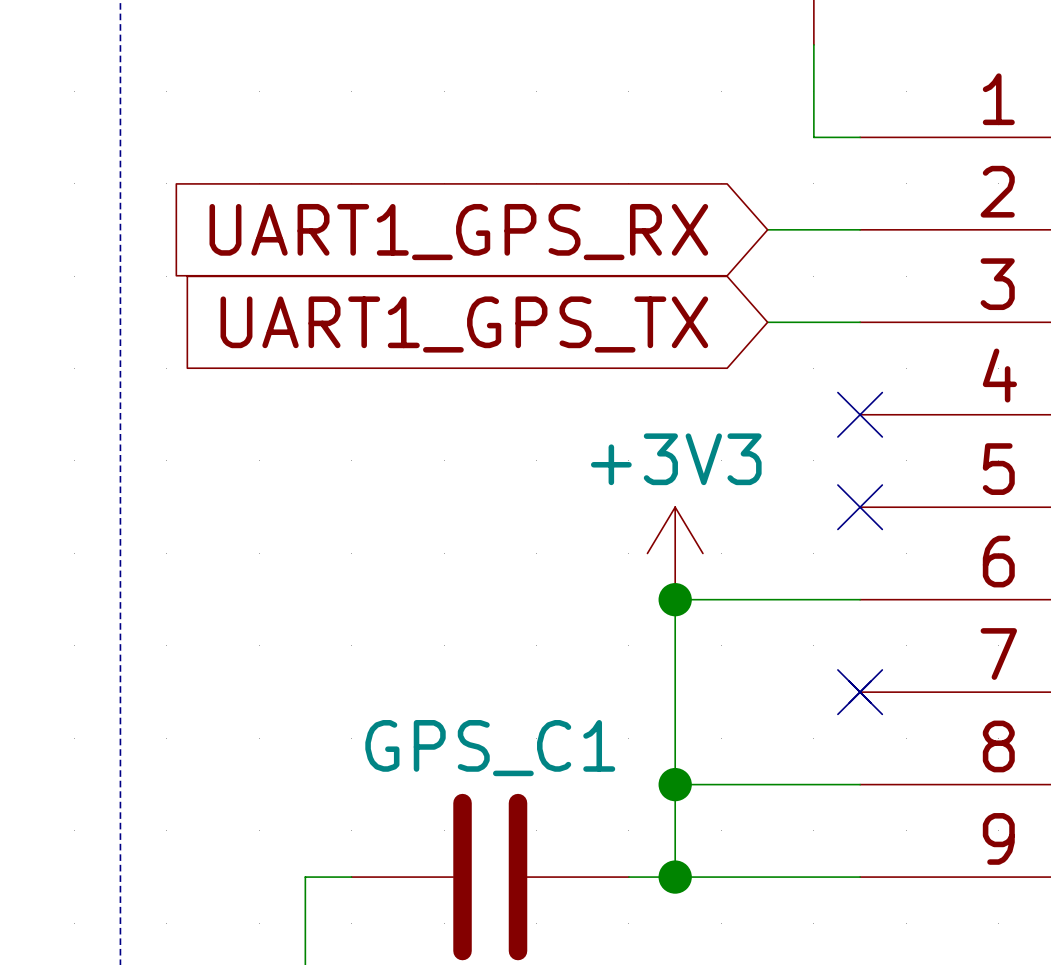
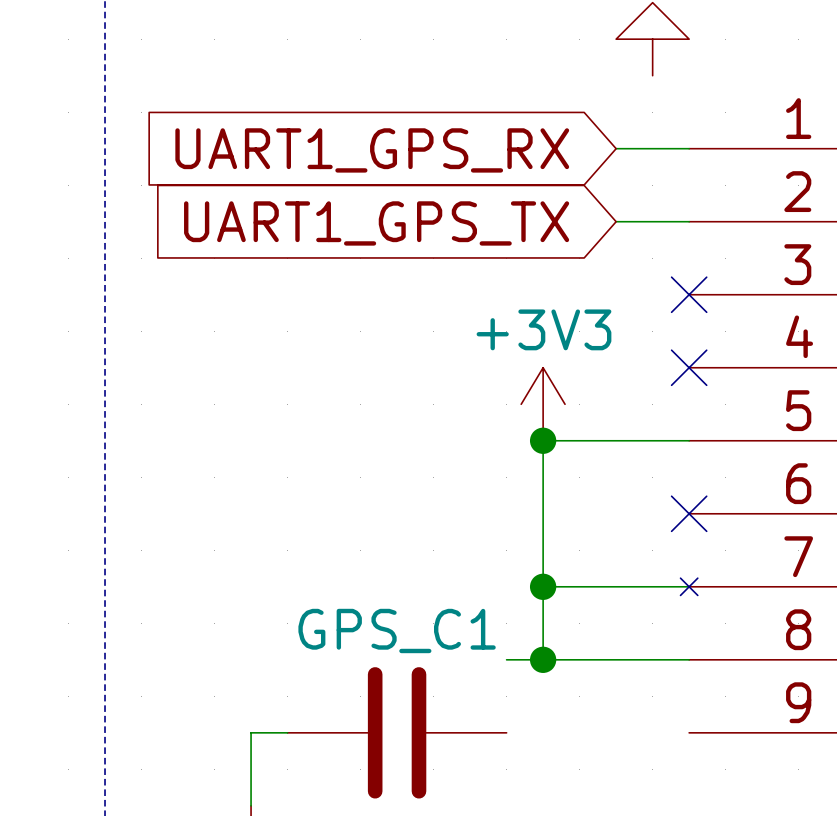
wire: (813, 44) (813, 137) -> (616, 148) (652, 148)
global label: none -> UART1_GPS_RX (372, 150)
global label: UART1_GPS_RX (458, 232) -> UART1_GPS_TX (376, 223)
wire: (767, 322) (860, 322) -> none
no-connect mark: none -> (689, 294)
global label: UART1_GPS_TX (464, 324) -> none
junction: none -> (543, 440)
no-connect mark: (860, 507) -> none
power symbol position: +3V3 (675, 553) -> +3V3 (543, 404)
wire: (675, 599) (860, 599) -> (543, 513) (543, 440) (689, 440)
junction: (675, 599) -> none
no-connect mark: none -> (689, 513)
wire: none -> (543, 586) (689, 586)
junction: none -> (543, 586)
no-connect mark: (860, 692) -> none
wire: (675, 784) (675, 877) -> (543, 659) (506, 659)
wire: (628, 877) (860, 877) -> none
junction: (675, 877) -> none

